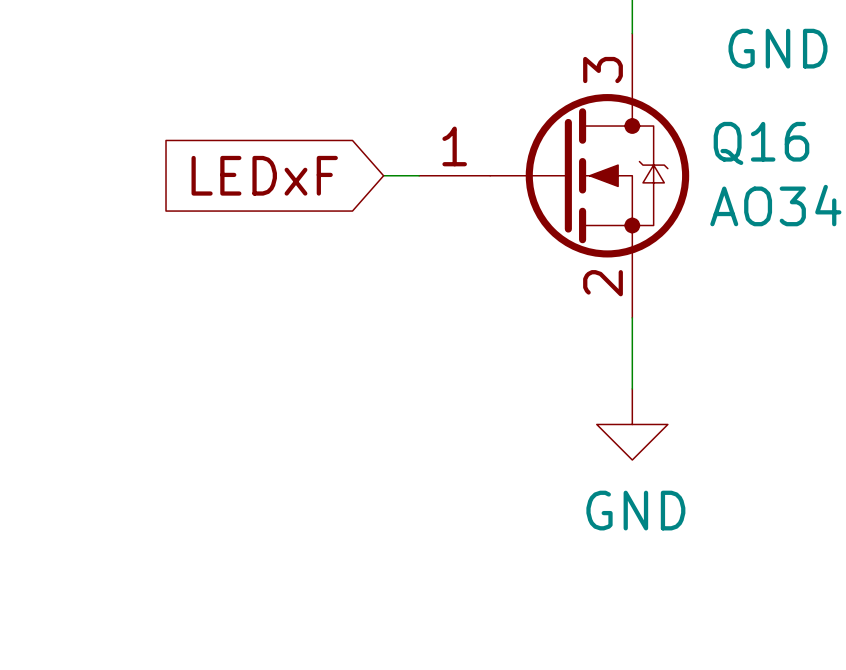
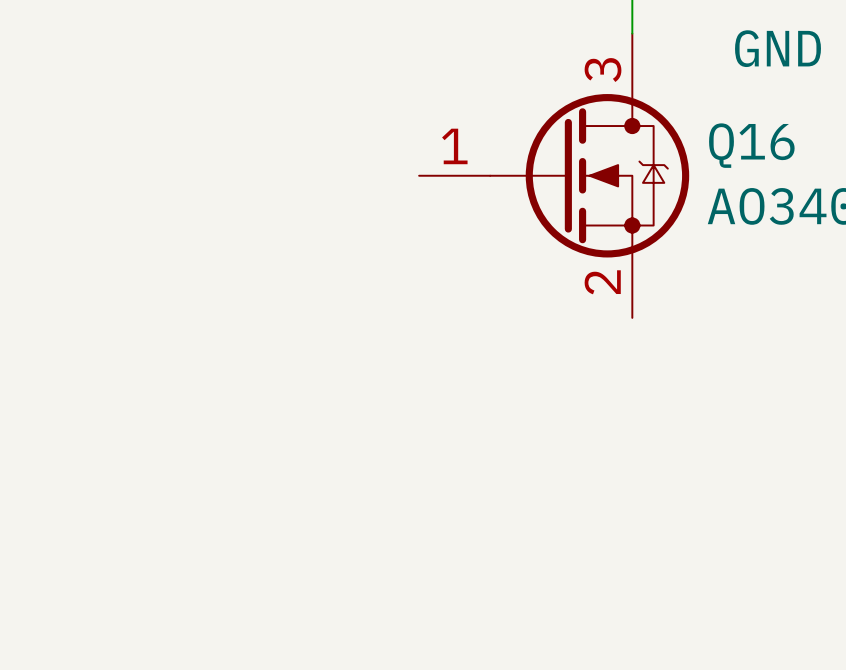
global label: LEDxF (264, 175) -> none
wire: (383, 175) (419, 175) -> none
wire: (632, 317) (632, 388) -> none
power symbol: GND (632, 424) -> none

